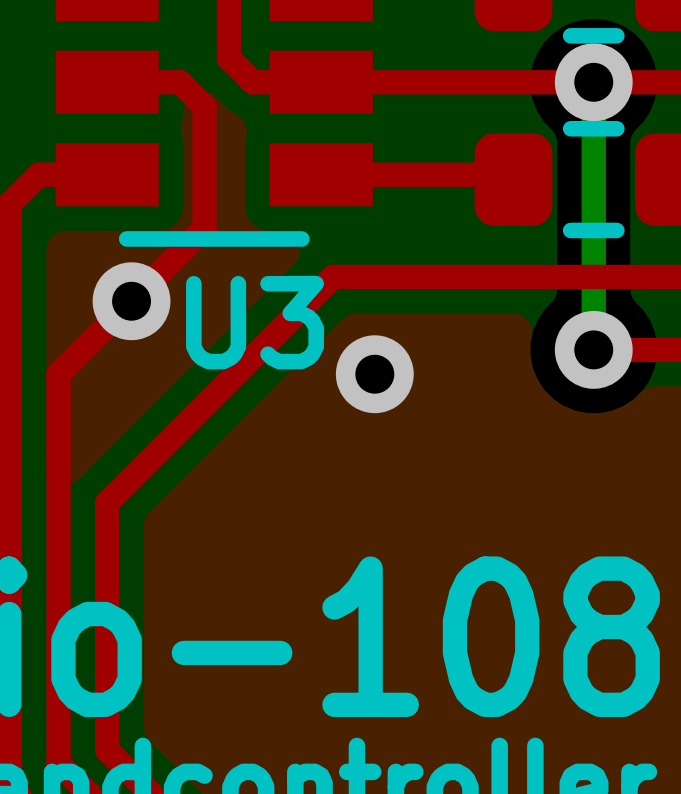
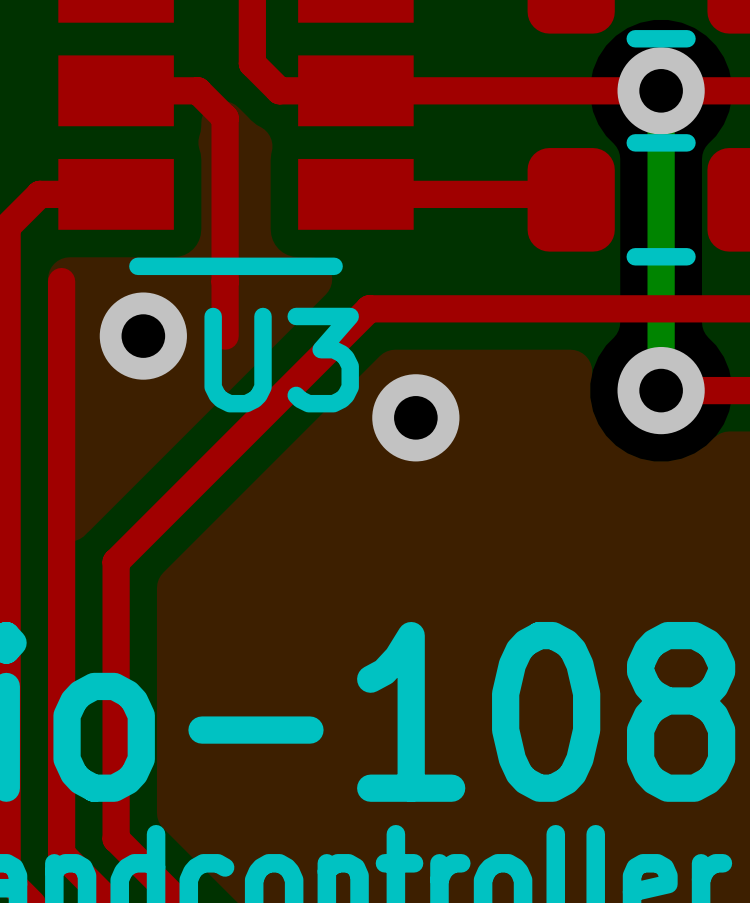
top track: (204, 228) (58, 374) -> (61, 281) (61, 417)
top track: none -> (225, 254) (225, 336)

